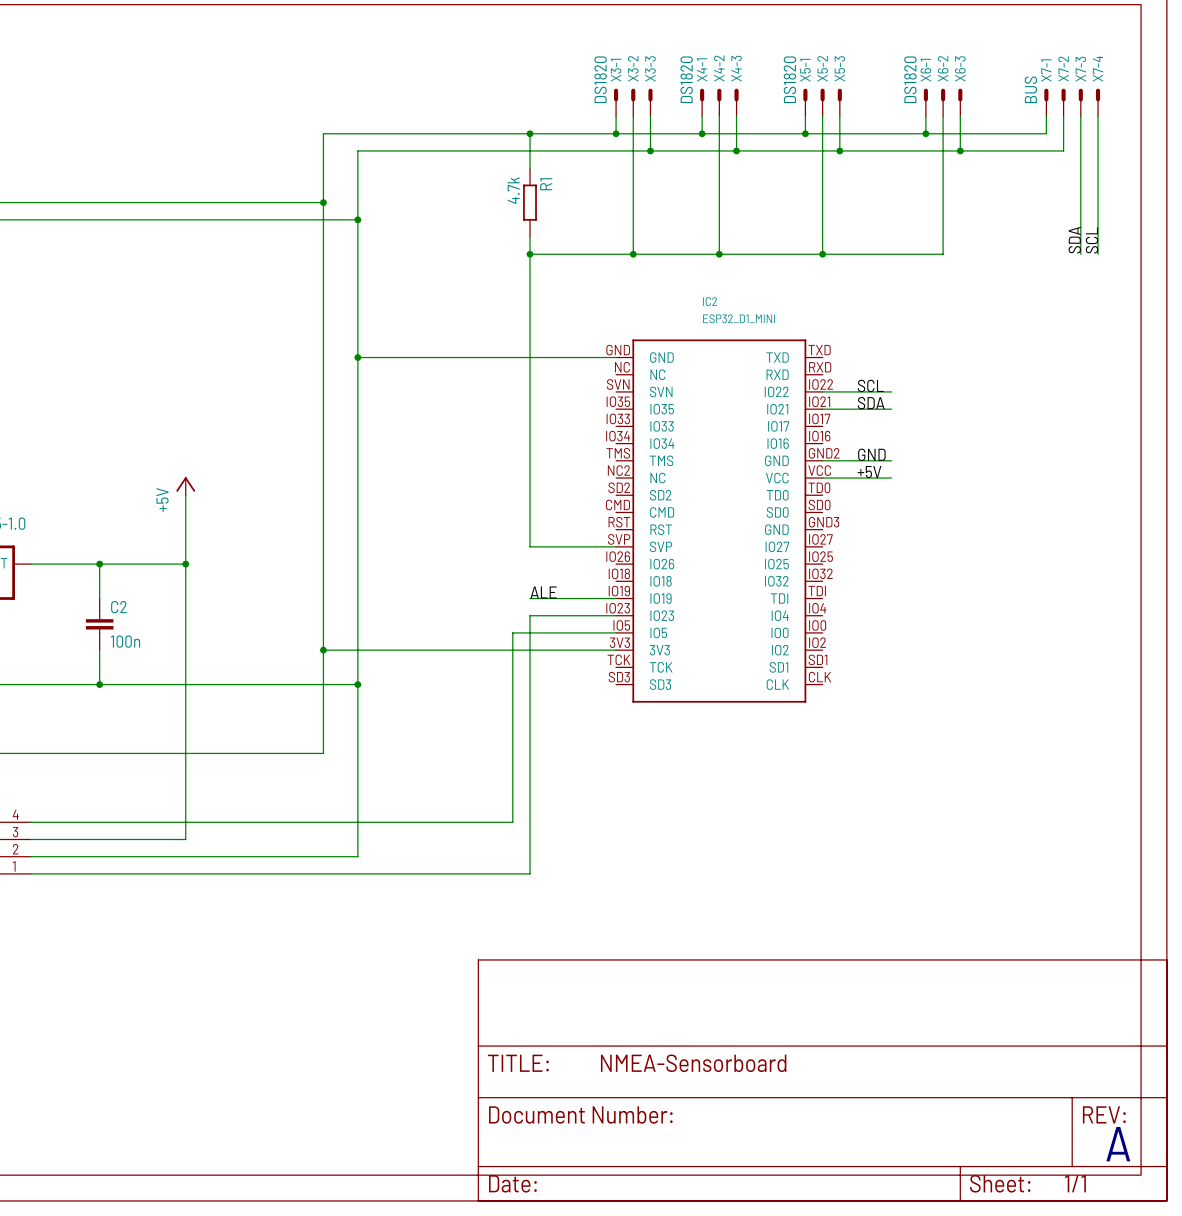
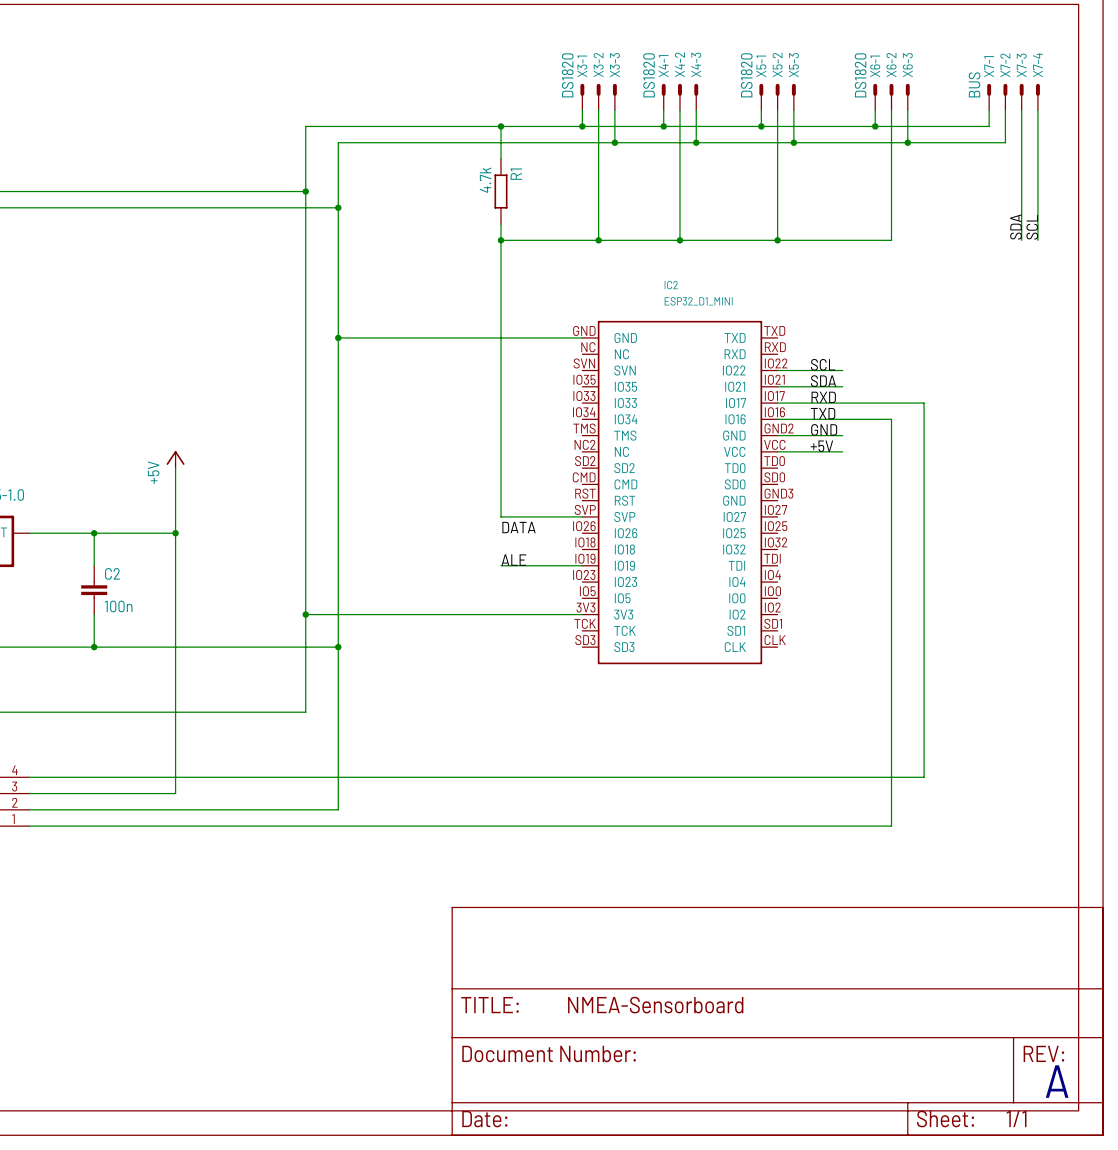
label: none -> RXD (823, 397)
label: none -> TXD (823, 413)
label: none -> DATA (519, 527)
wire: (616, 615) (529, 615) (529, 873) -> (777, 419) (891, 419) (891, 826) (501, 826)
wire: (616, 632) (512, 632) (512, 822) -> (777, 403) (924, 403) (924, 777) (484, 777)

